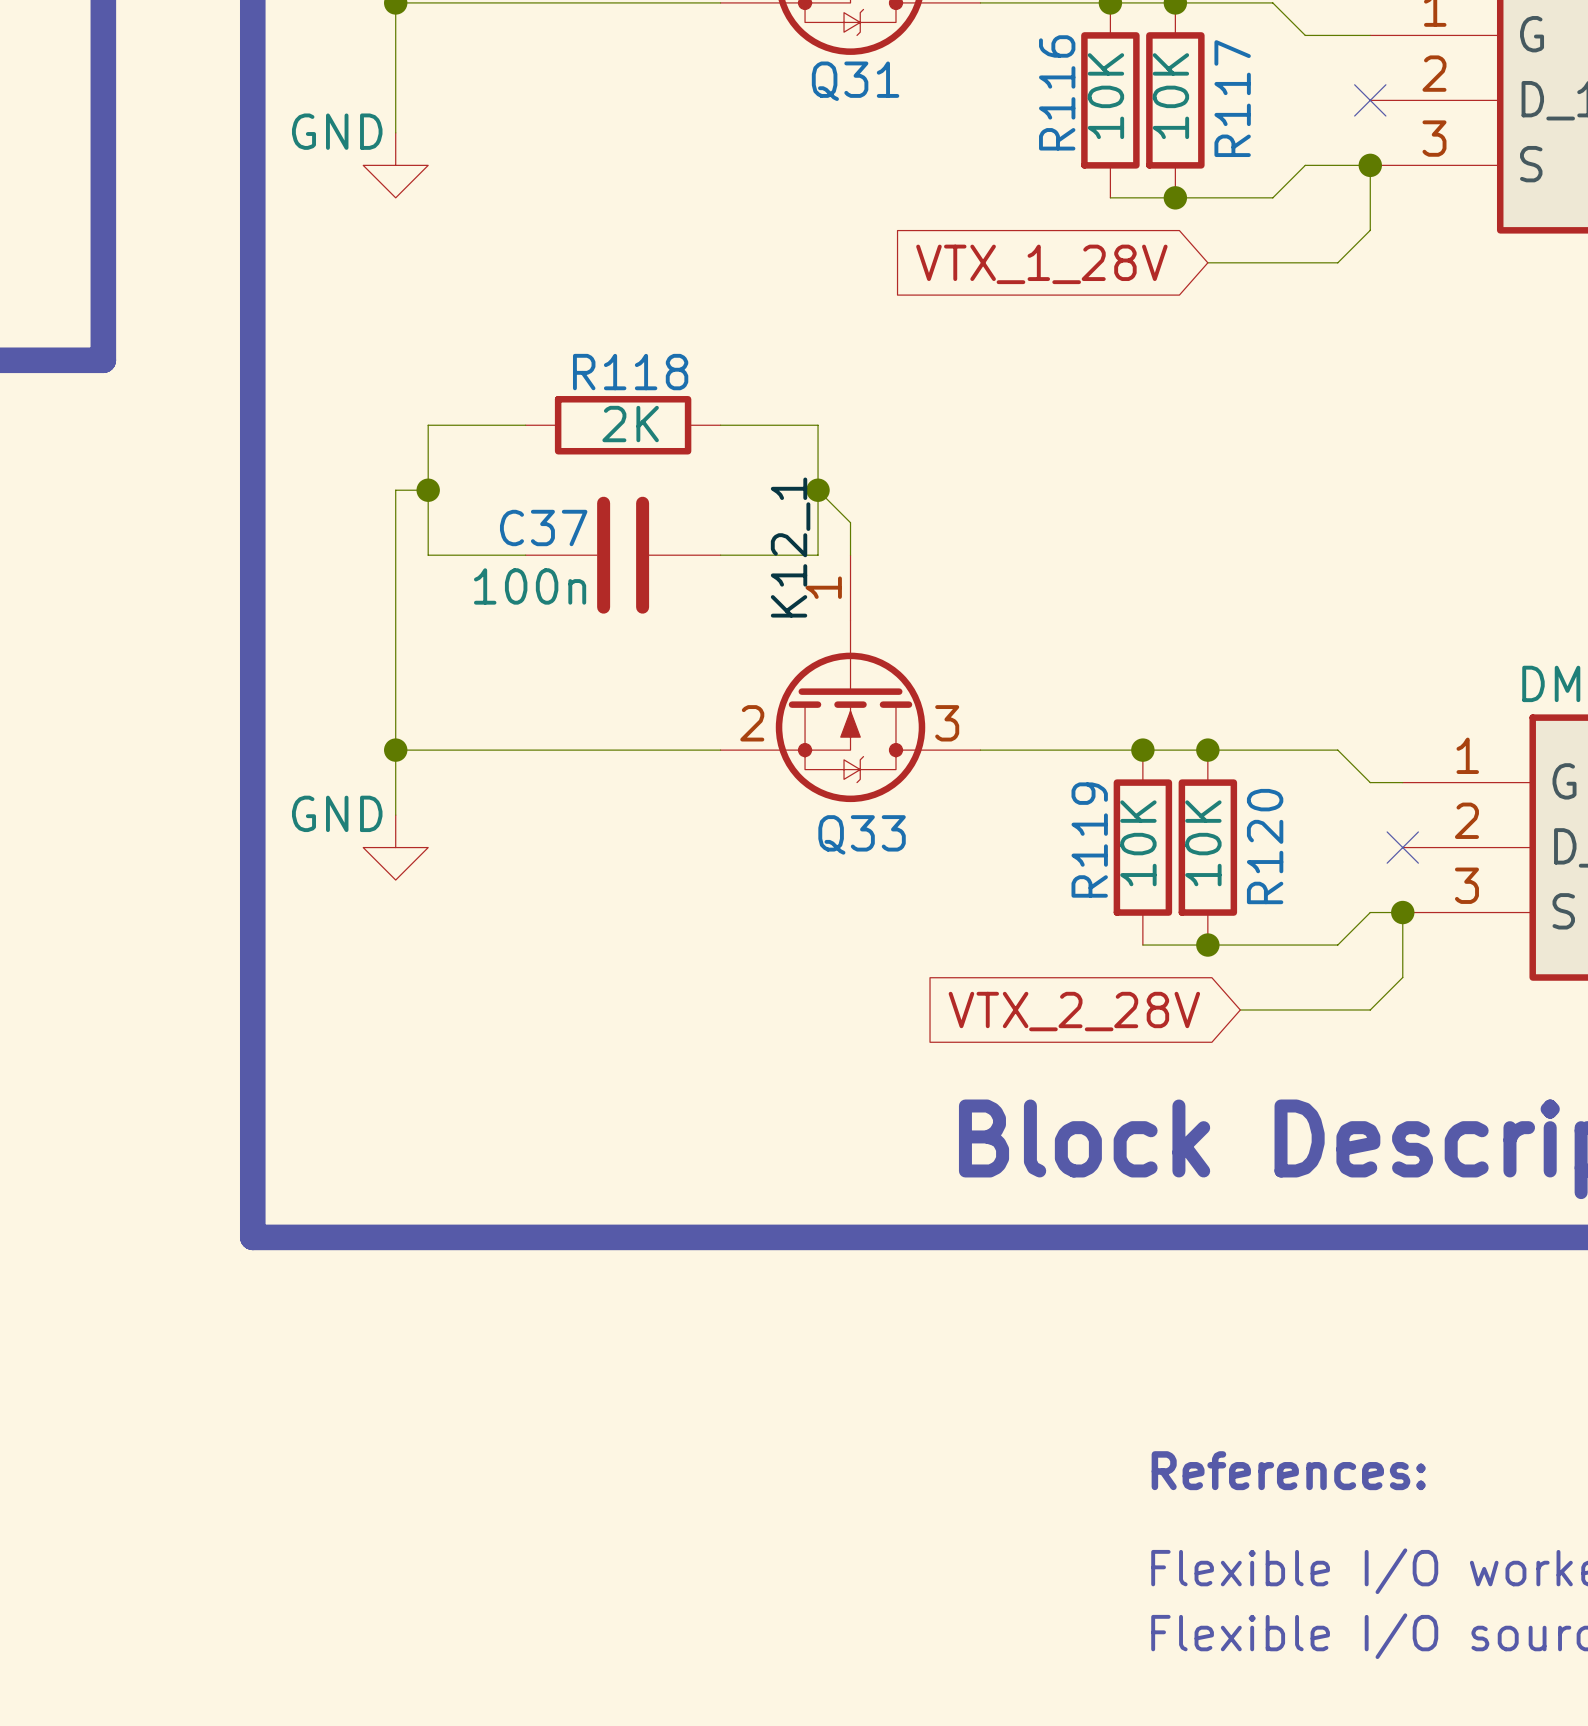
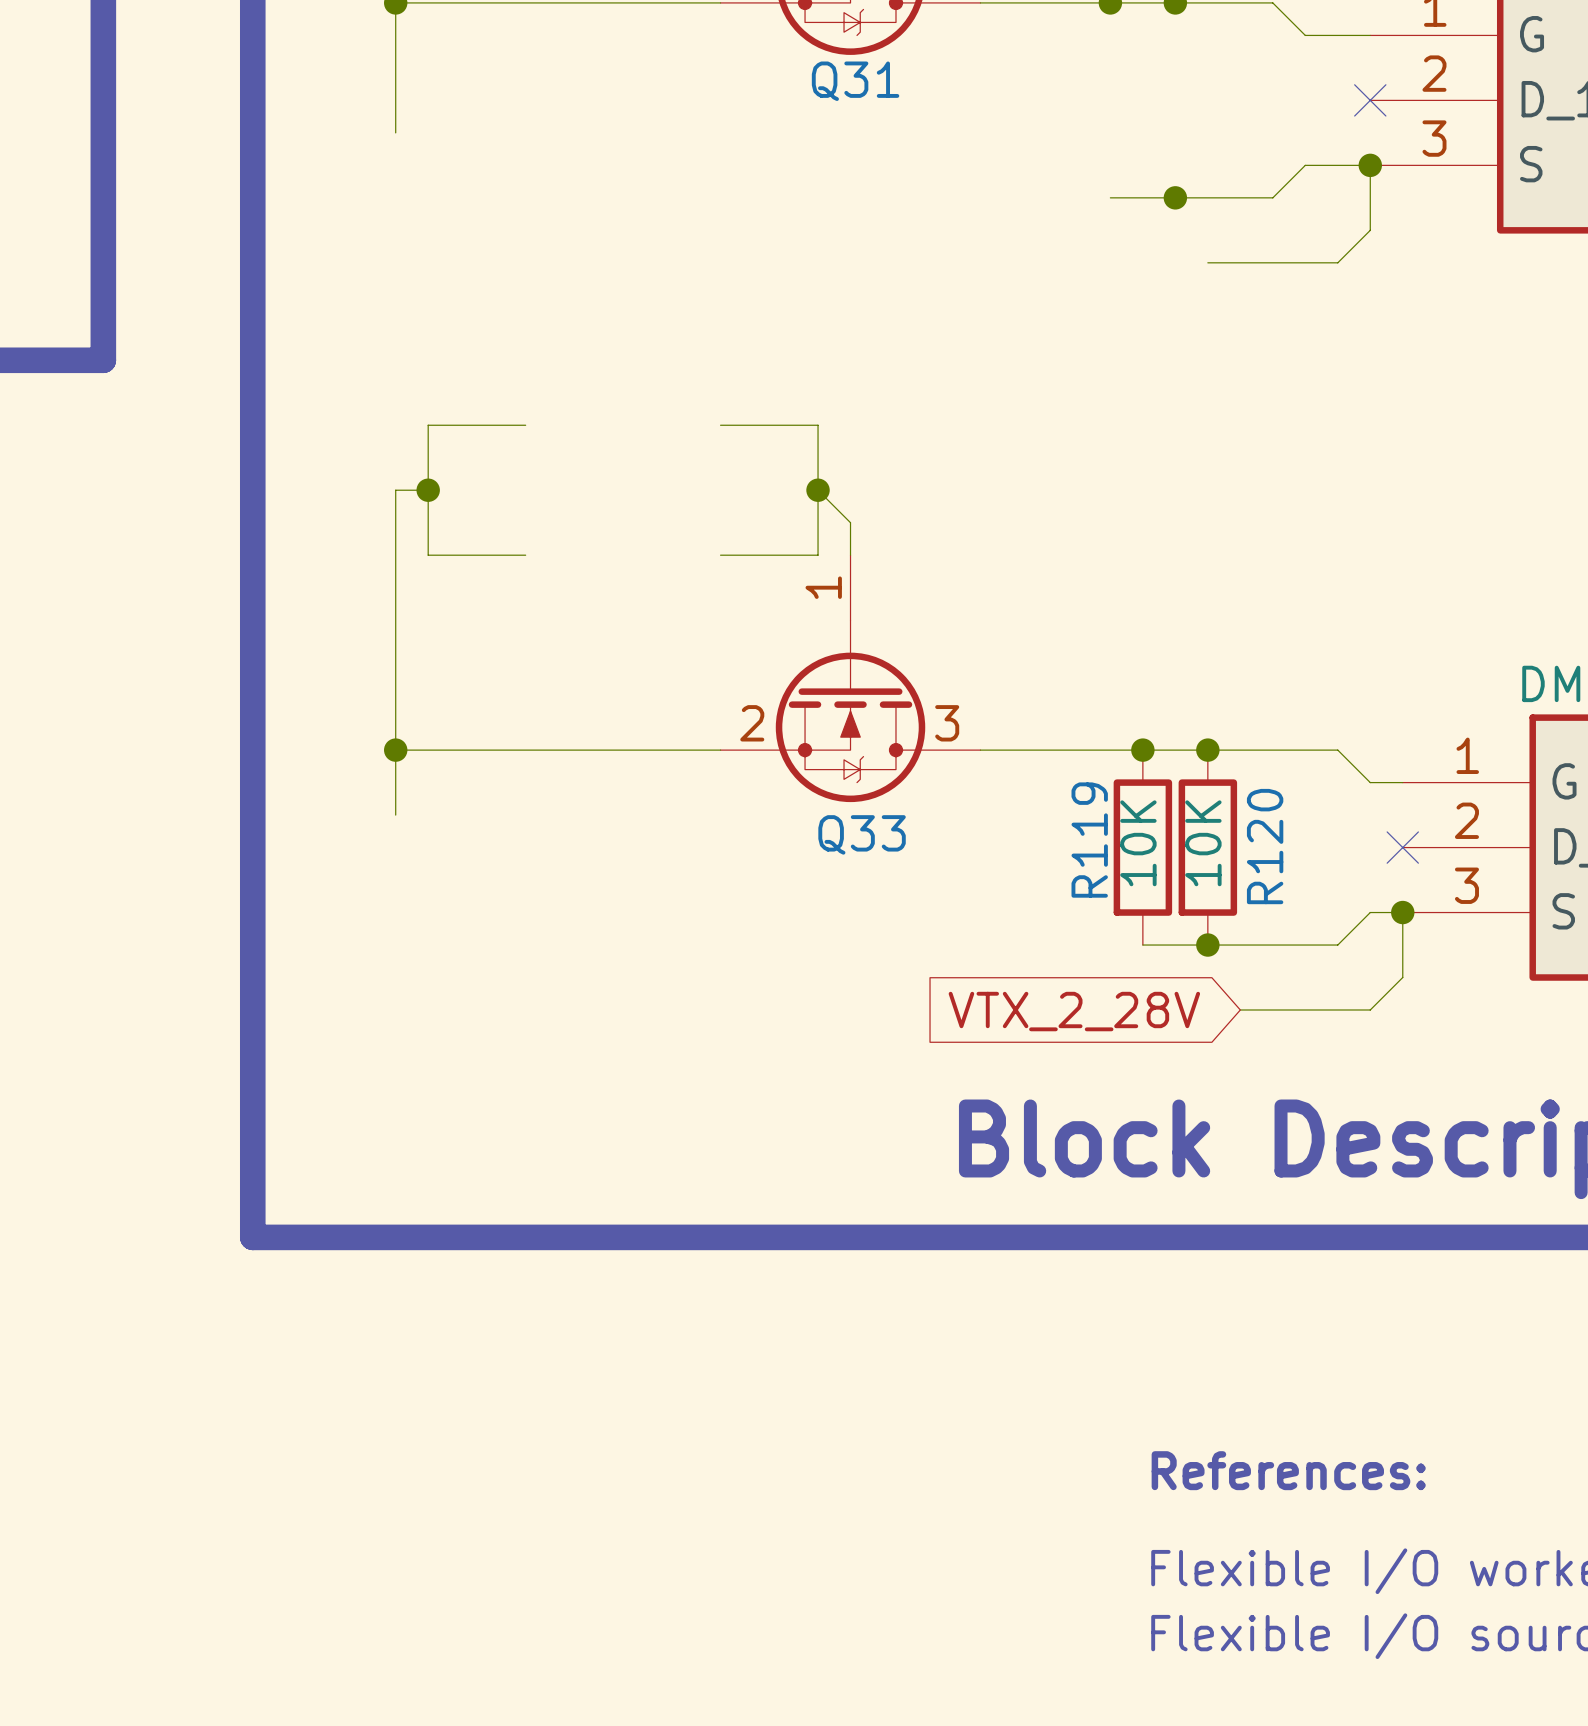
R116: 10K (1110, 100) -> none
R117: 10K (1175, 100) -> none
power symbol: GND (395, 165) -> none
global label: VTX_1_28V (1041, 264) -> none
R118: 2K (623, 425) -> none
label: K12_1 (790, 547) -> none
C37: 100n (623, 555) -> none
power symbol: GND (395, 847) -> none

